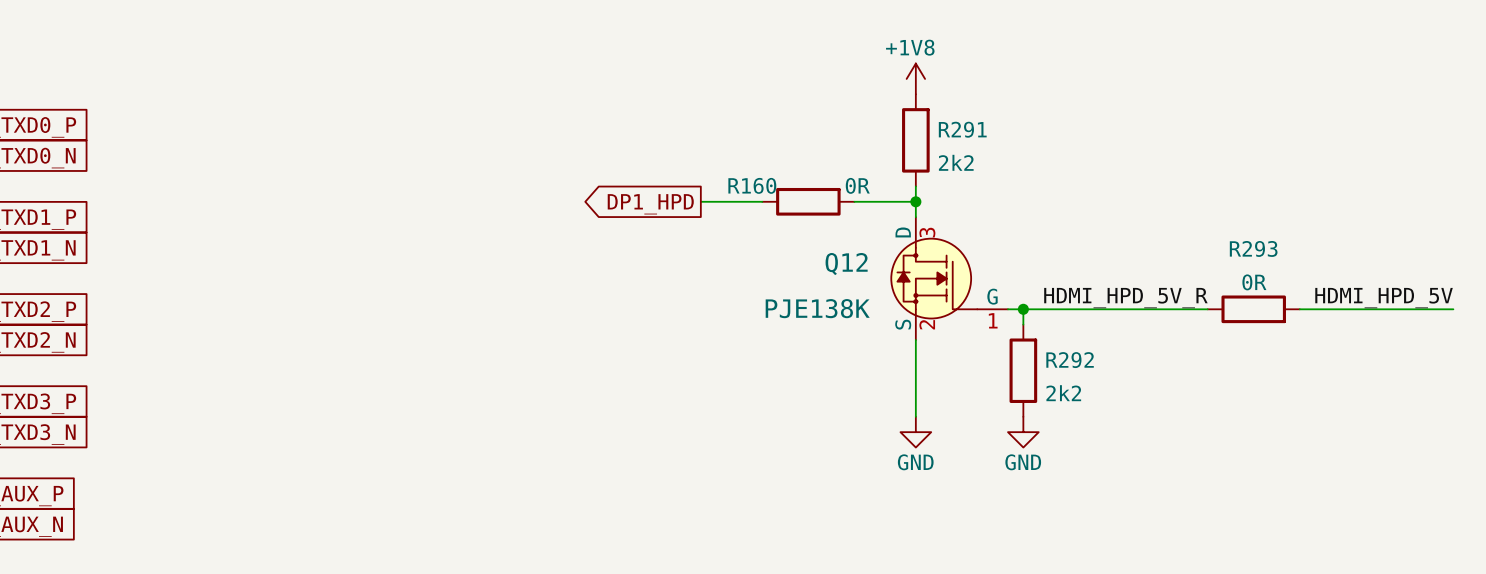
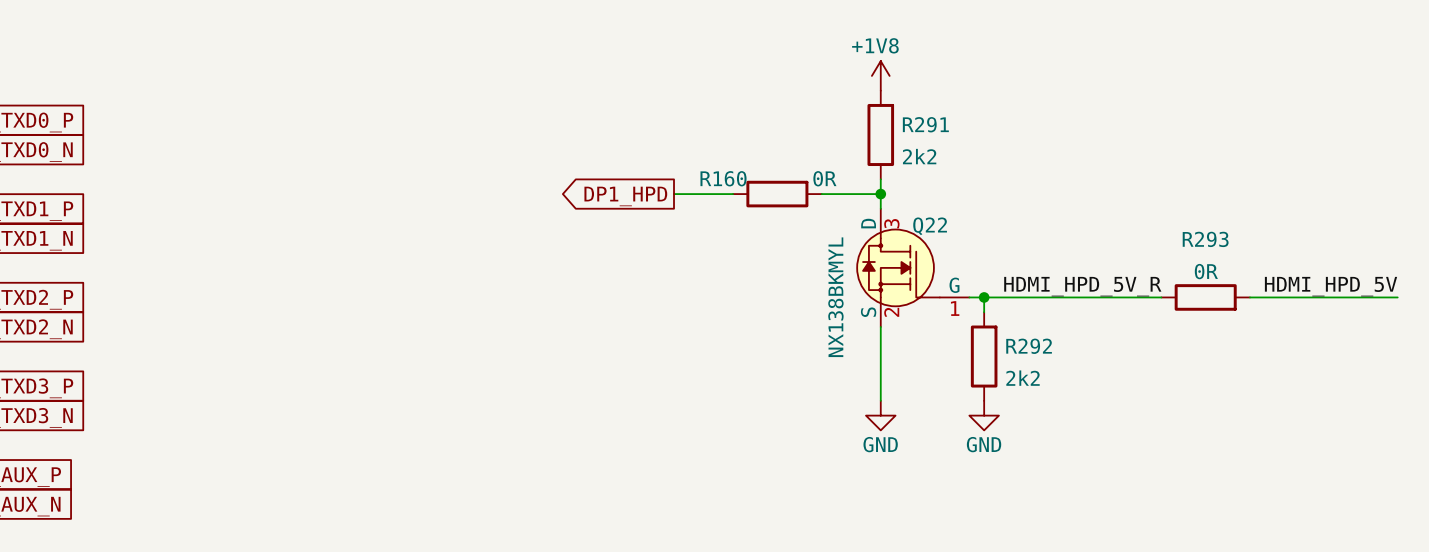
Q12 name: Q12 (846, 264) -> Q22 (930, 226)
Q12 value: PJE138K (817, 308) -> NX138BKMYL (835, 297)

